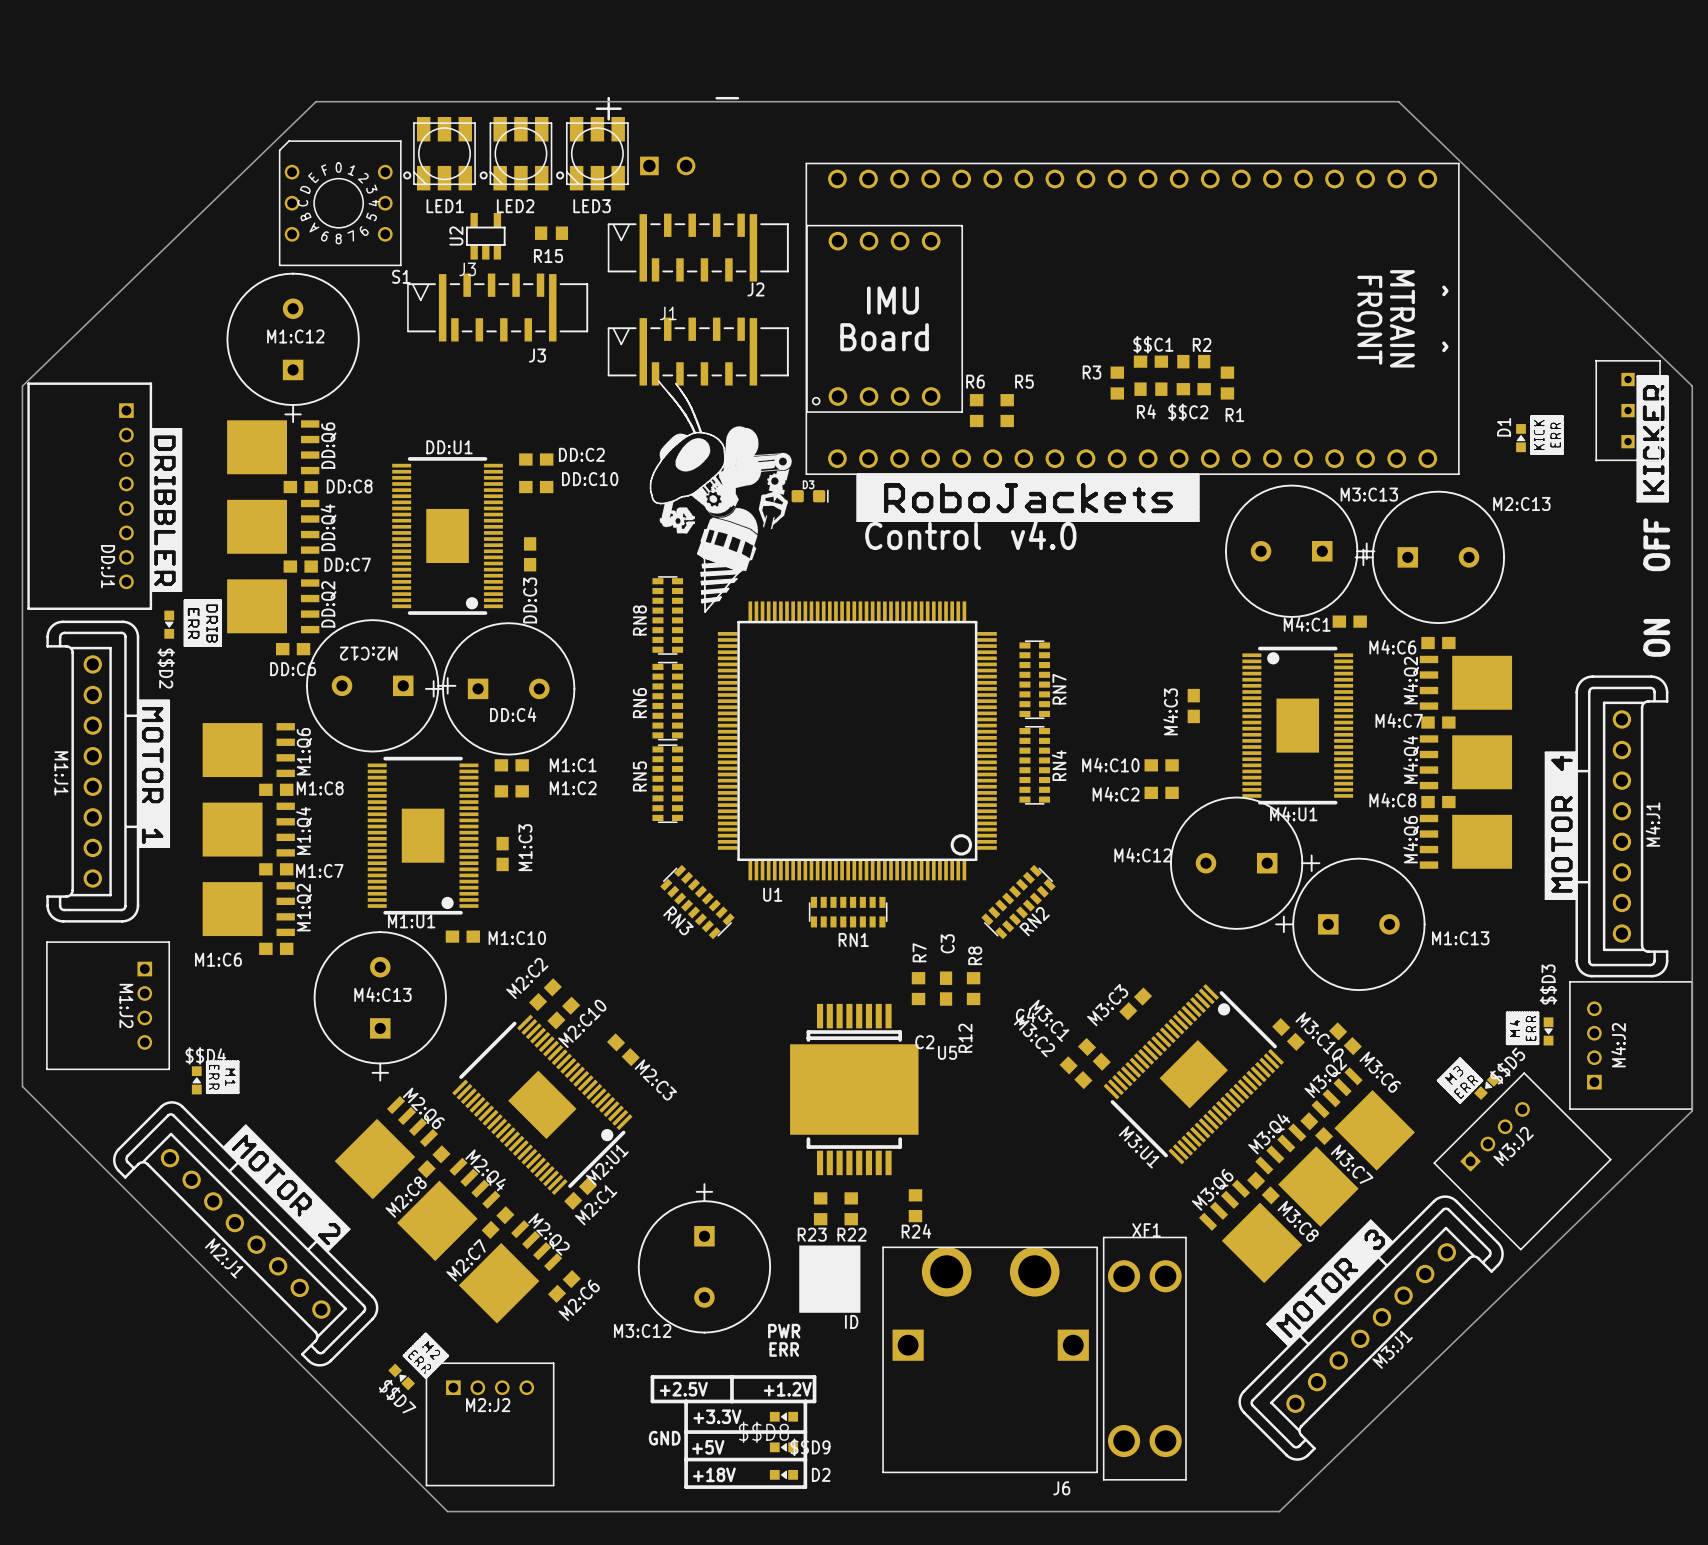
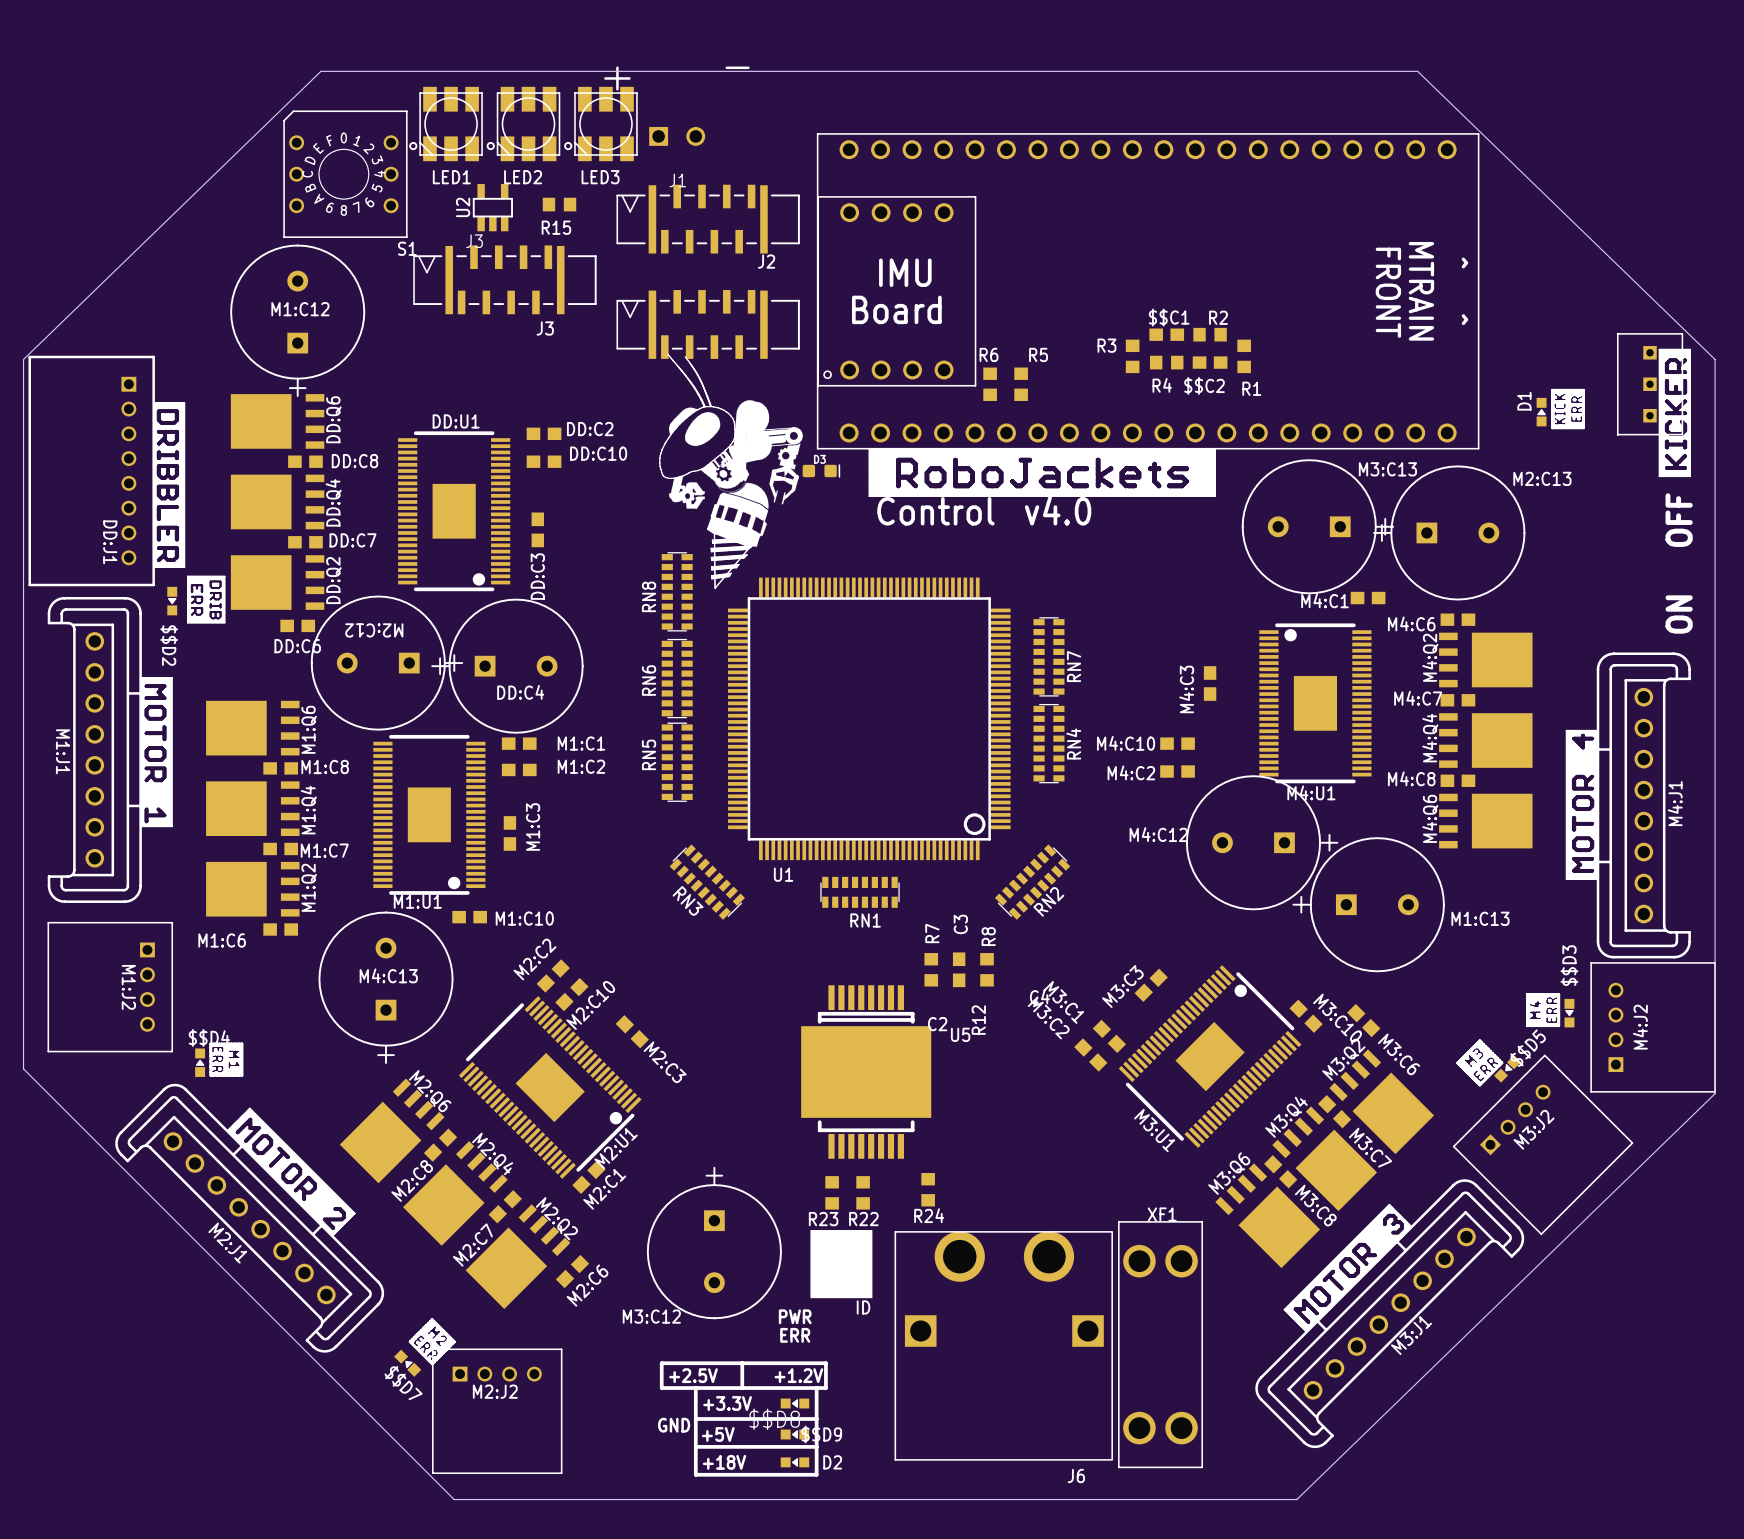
J1 name: none -> J1 (677, 180)
J1 name: J1 (668, 313) -> none

